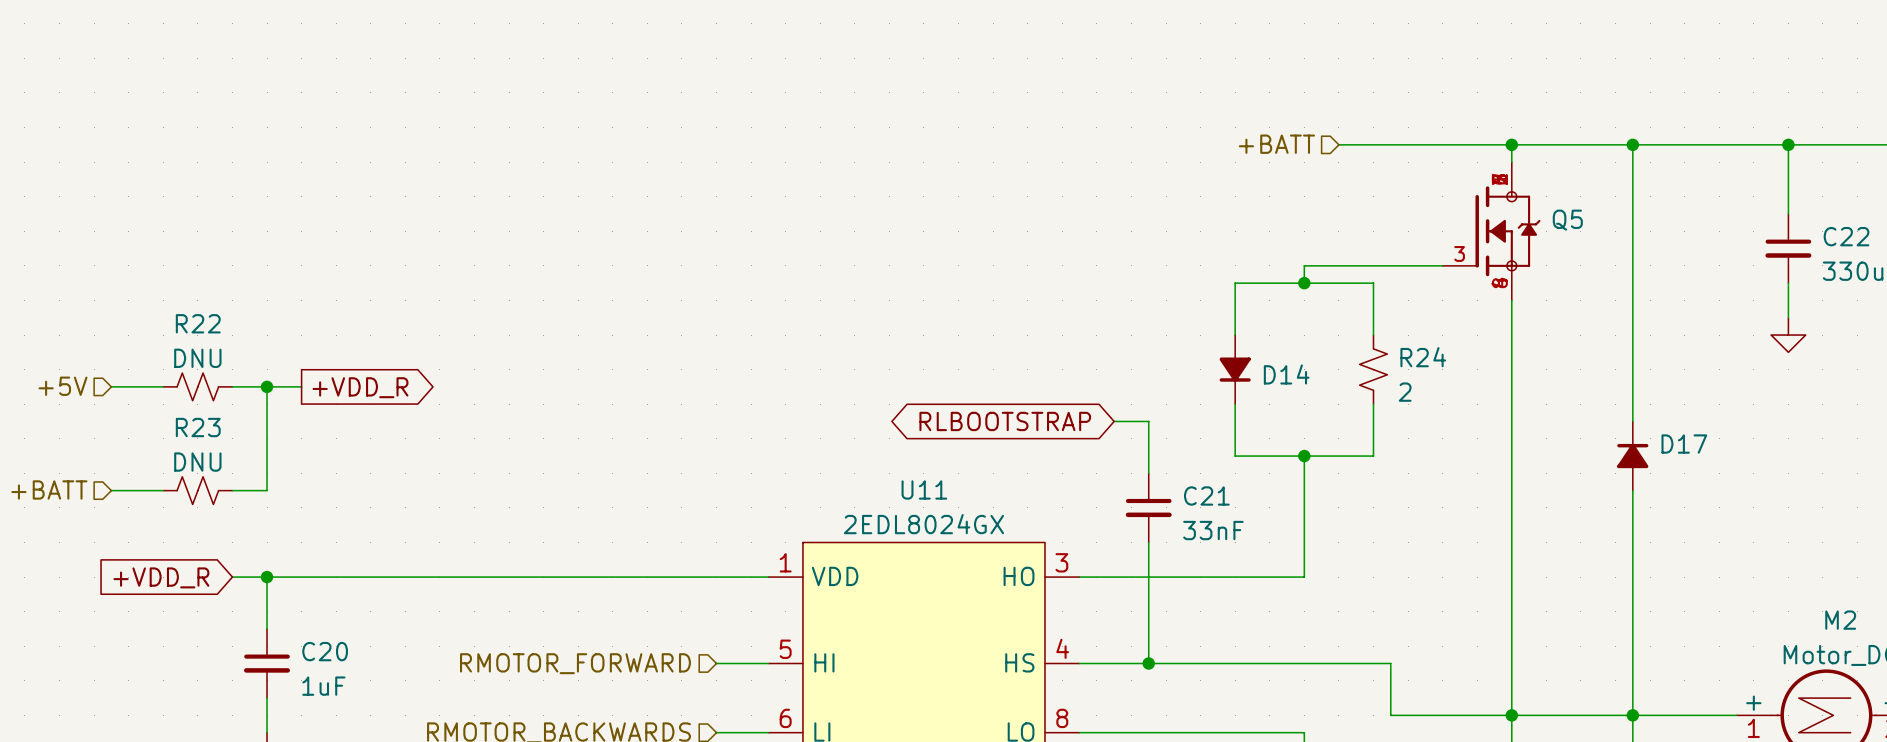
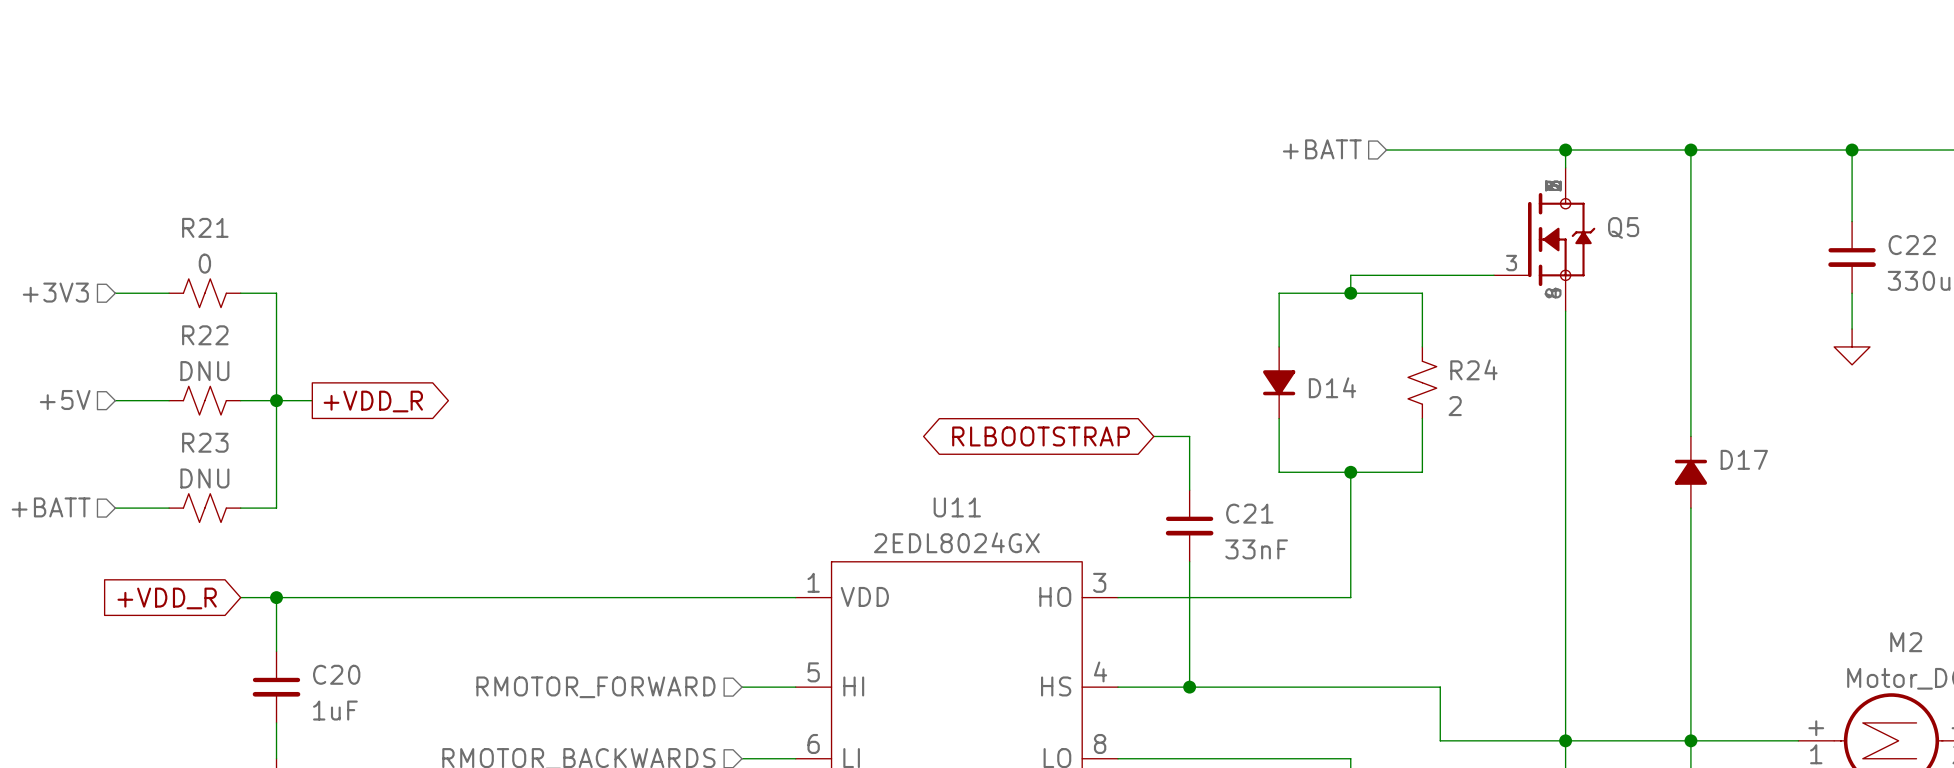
hierarchical label: none -> +3V3 (55, 292)
wire: none -> (115, 293) (169, 293)
R21: none -> 0 (204, 293)
wire: none -> (240, 293) (276, 293) (276, 400)

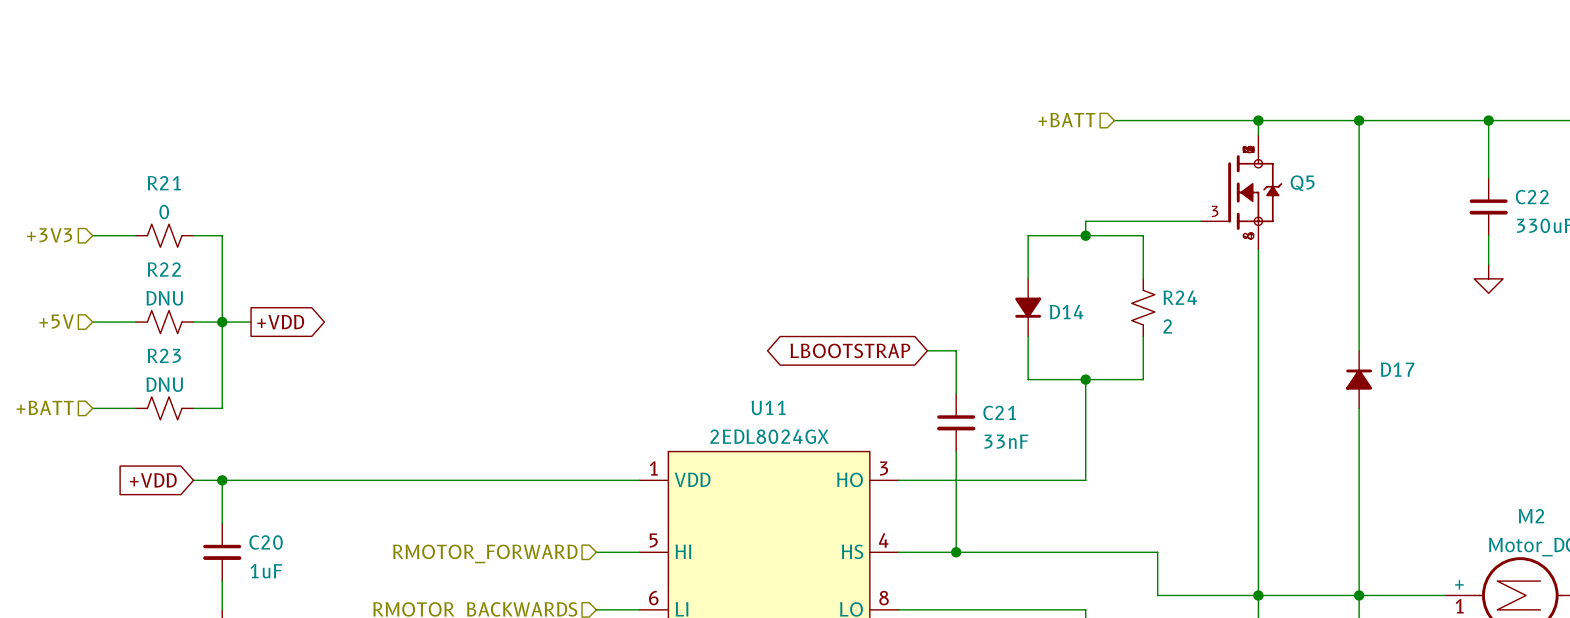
global label: +VDD_R (373, 401) -> +VDD (280, 322)
global label: RLBOOTSTRAP (1041, 436) -> LBOOTSTRAP (850, 350)
global label: +VDD_R (167, 598) -> +VDD (153, 480)

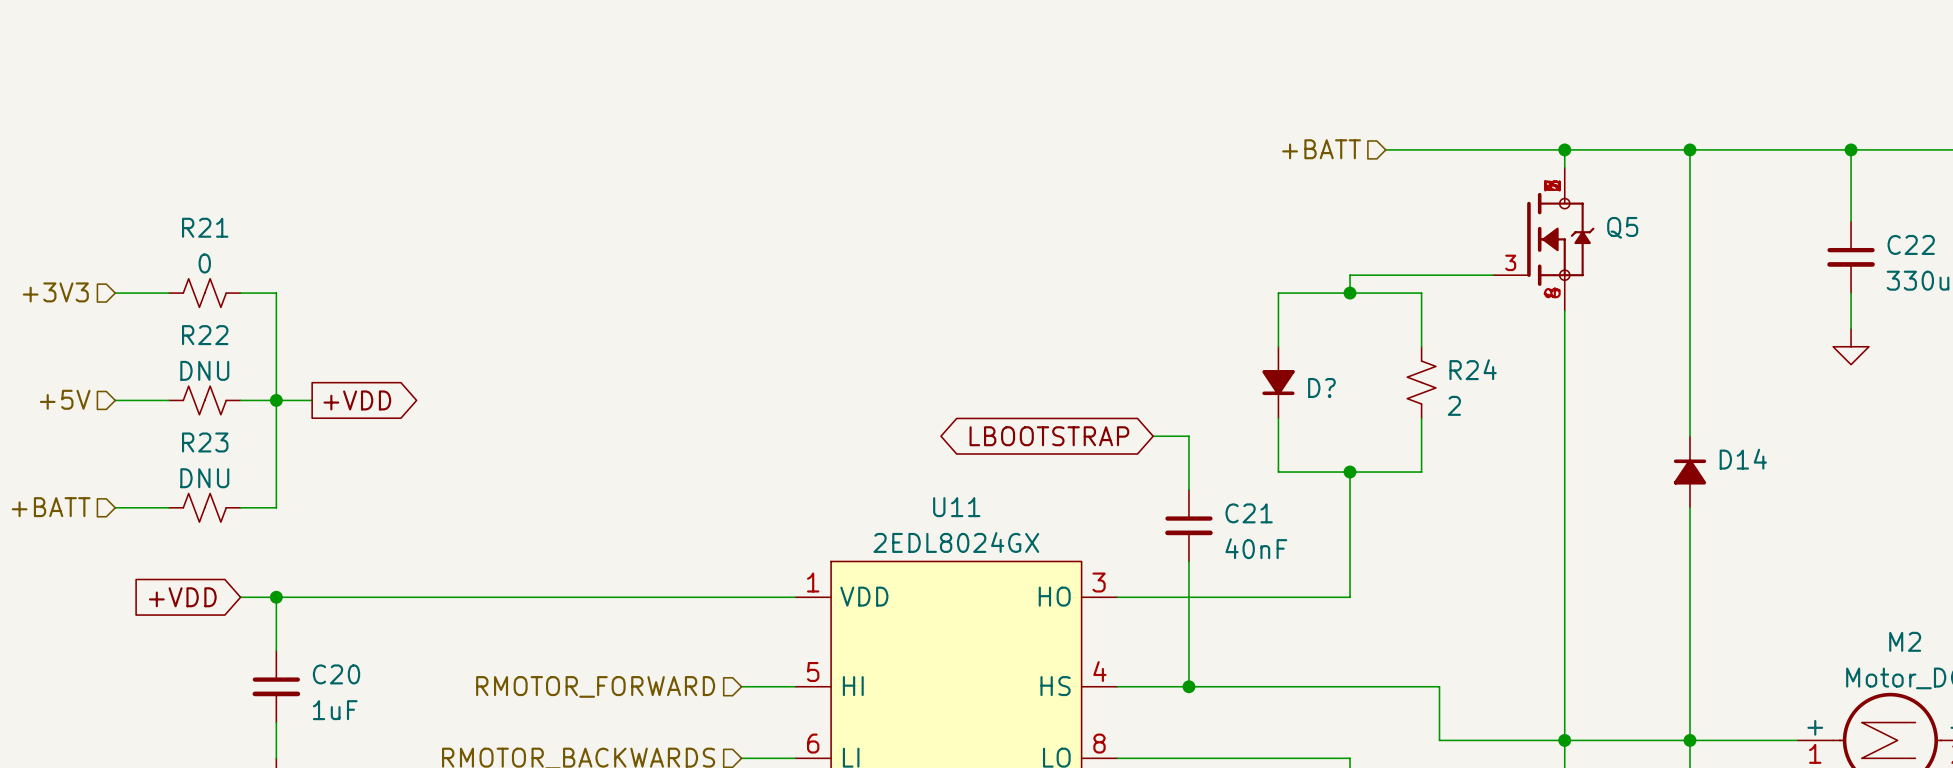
D14 name: D14 (1066, 312) -> D? (1321, 387)
D17 name: D17 (1397, 369) -> D14 (1743, 459)
C21 value: 33nF (1006, 441) -> 40nF (1256, 548)

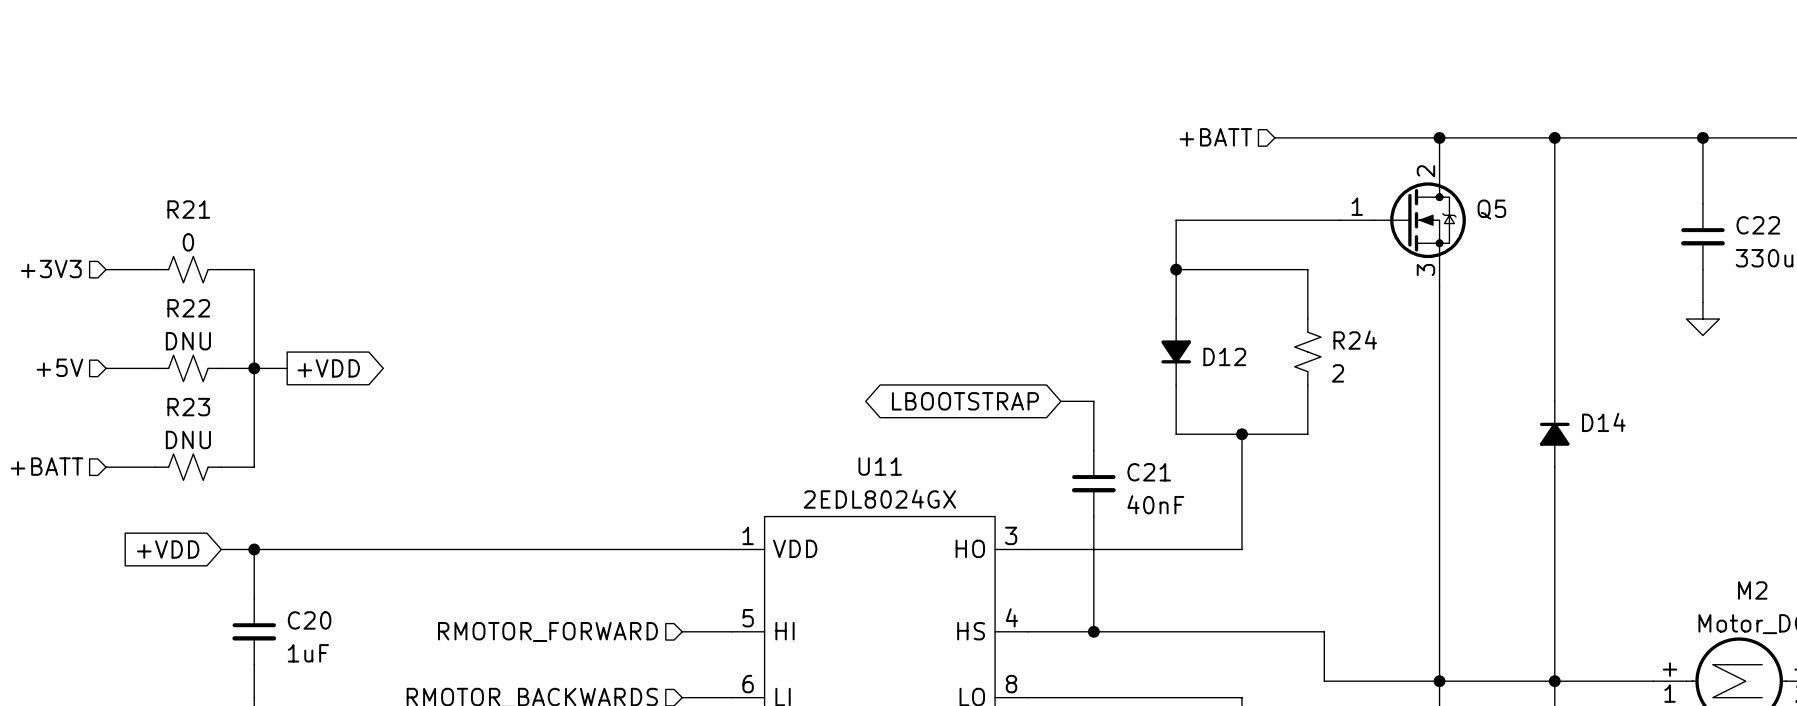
Q5 symbol: [1493, 167, 1595, 311] -> [1340, 154, 1466, 287]
wire: none -> (1340, 220) (1176, 220) (1176, 269)
wire: (1493, 275) (1350, 275) (1350, 293) -> none
junction position: (1350, 293) -> (1176, 269)
D? name: D? (1321, 387) -> D12 (1224, 356)

